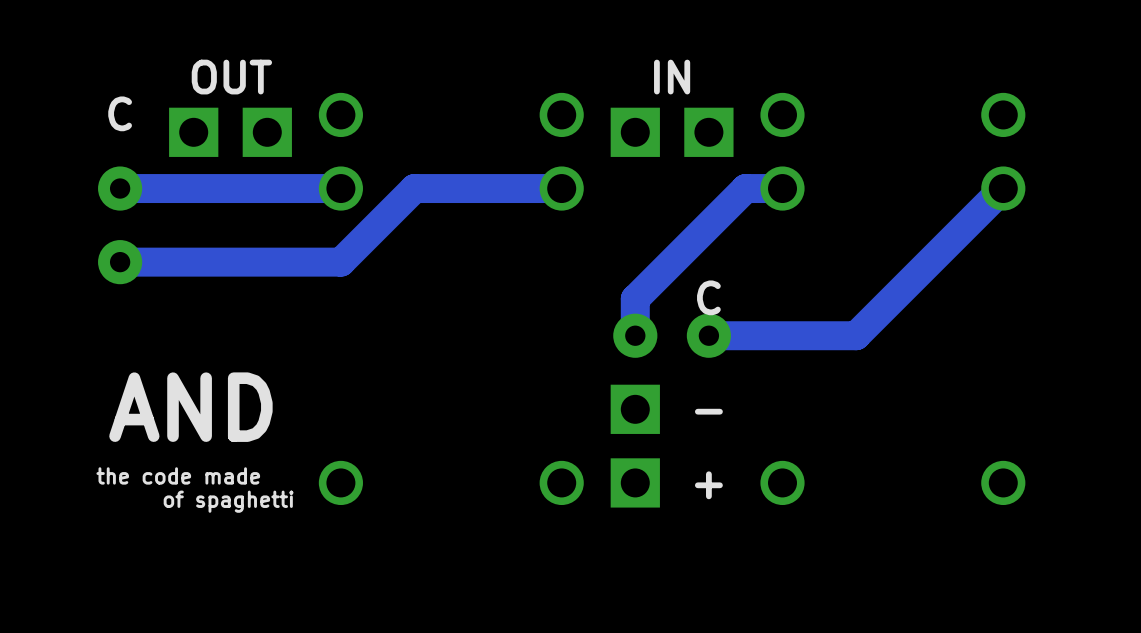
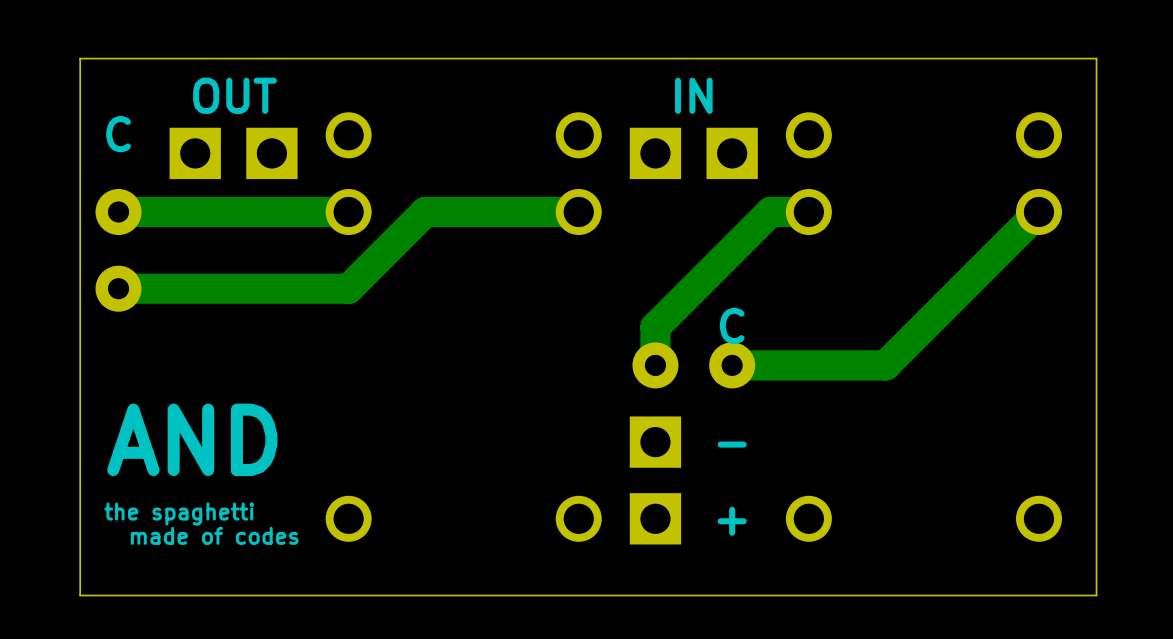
board edge: none -> (1096, 58) (1096, 595) (80, 595) (80, 58) (1096, 58)
text: the code made (178, 475) -> the spaghetti (179, 514)
text: of spaghetti (228, 501) -> made of codes (214, 535)

